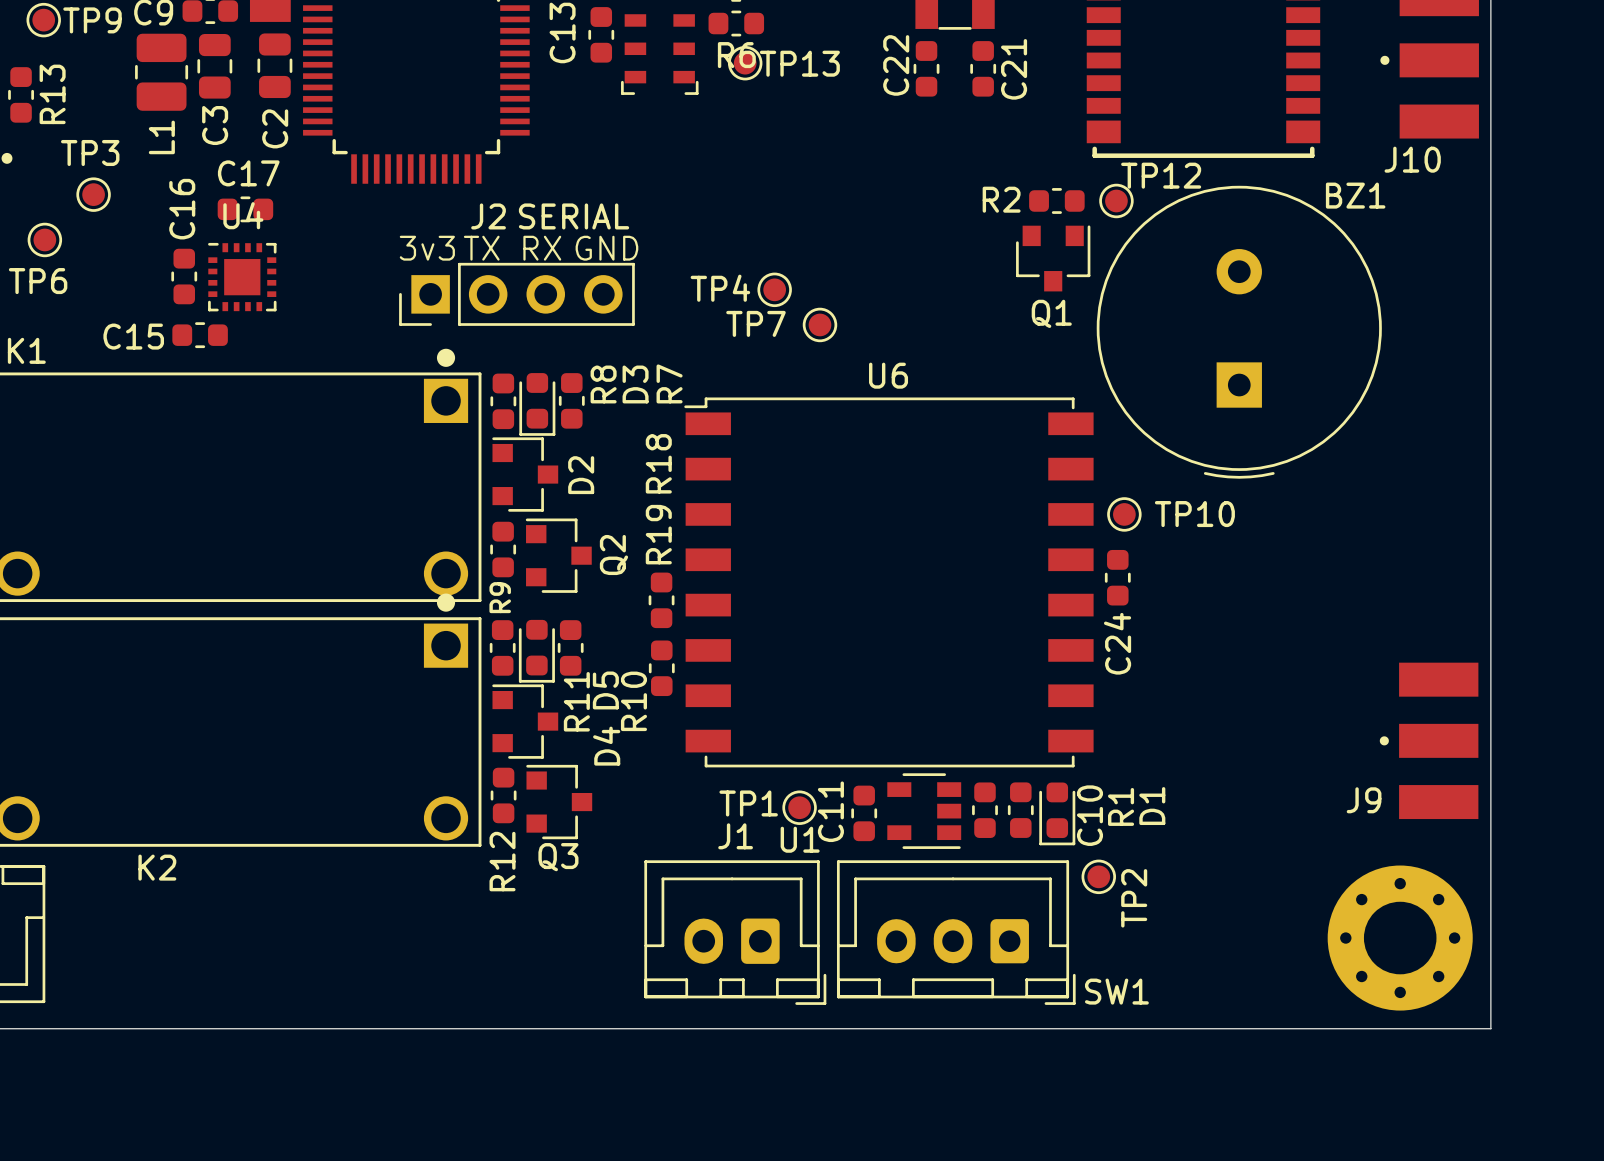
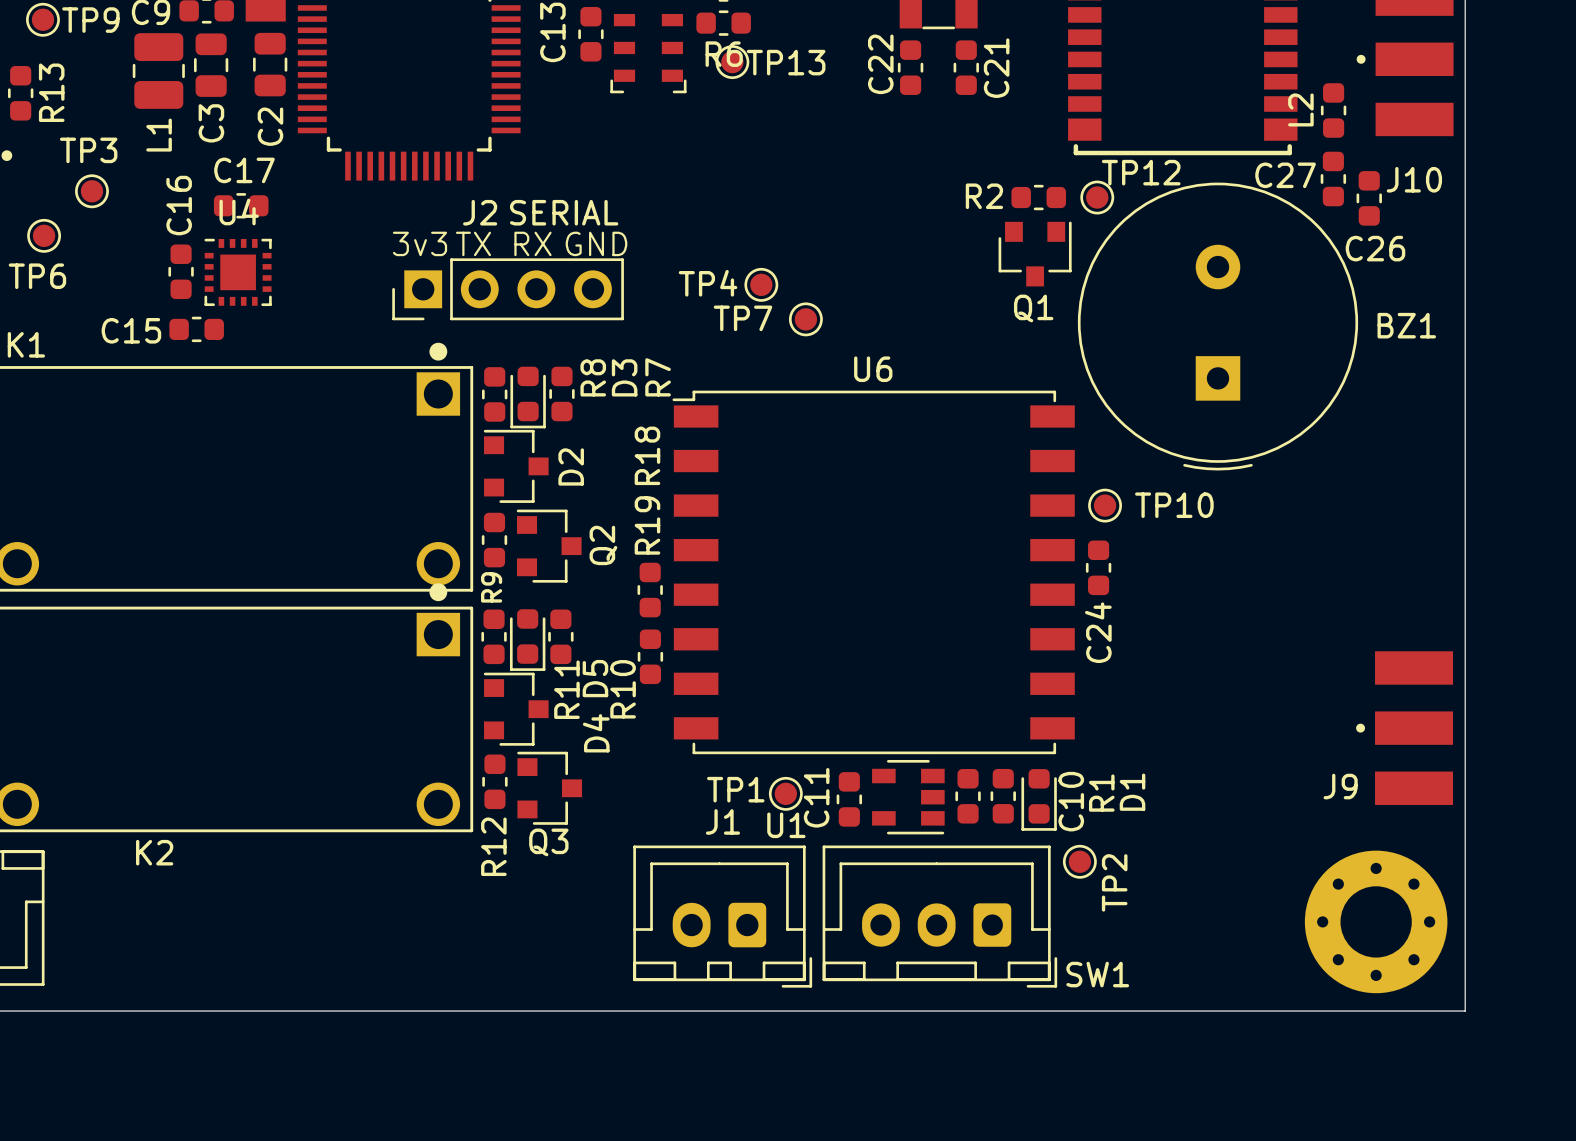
L2: none -> (1333, 110)
J10 name position: J10 (1412, 159) -> J10 (1414, 179)
C27: none -> (1333, 178)
BZ1 name position: BZ1 (1355, 195) -> BZ1 (1406, 325)
C26: none -> (1369, 198)

